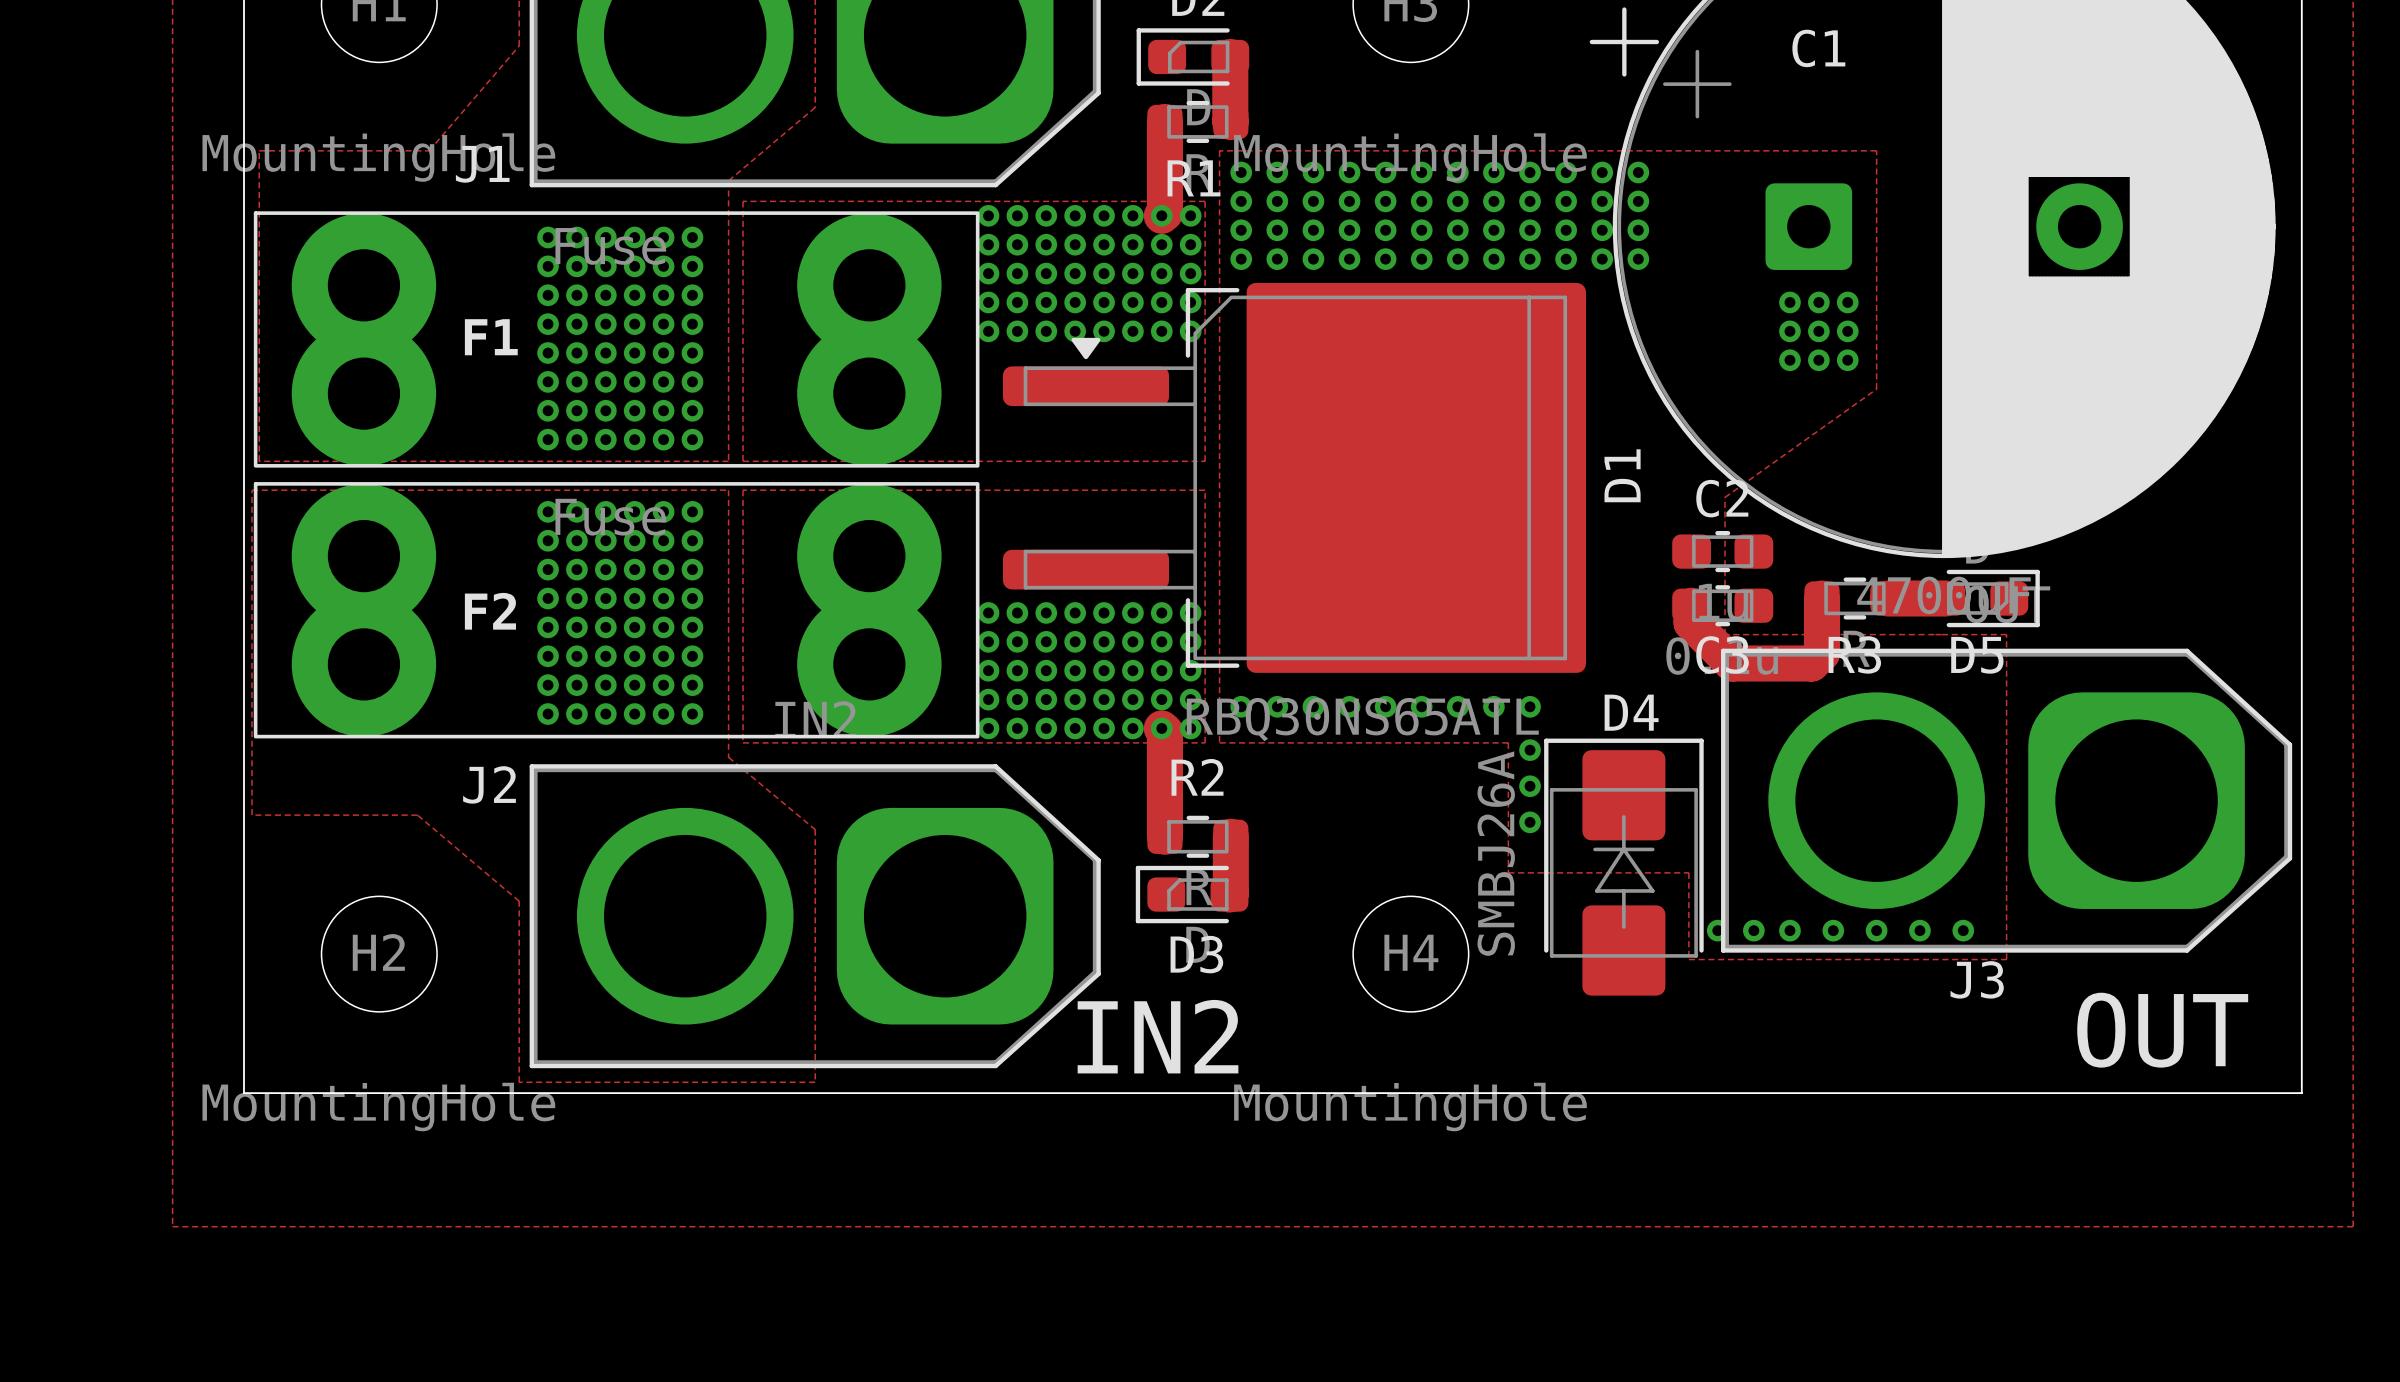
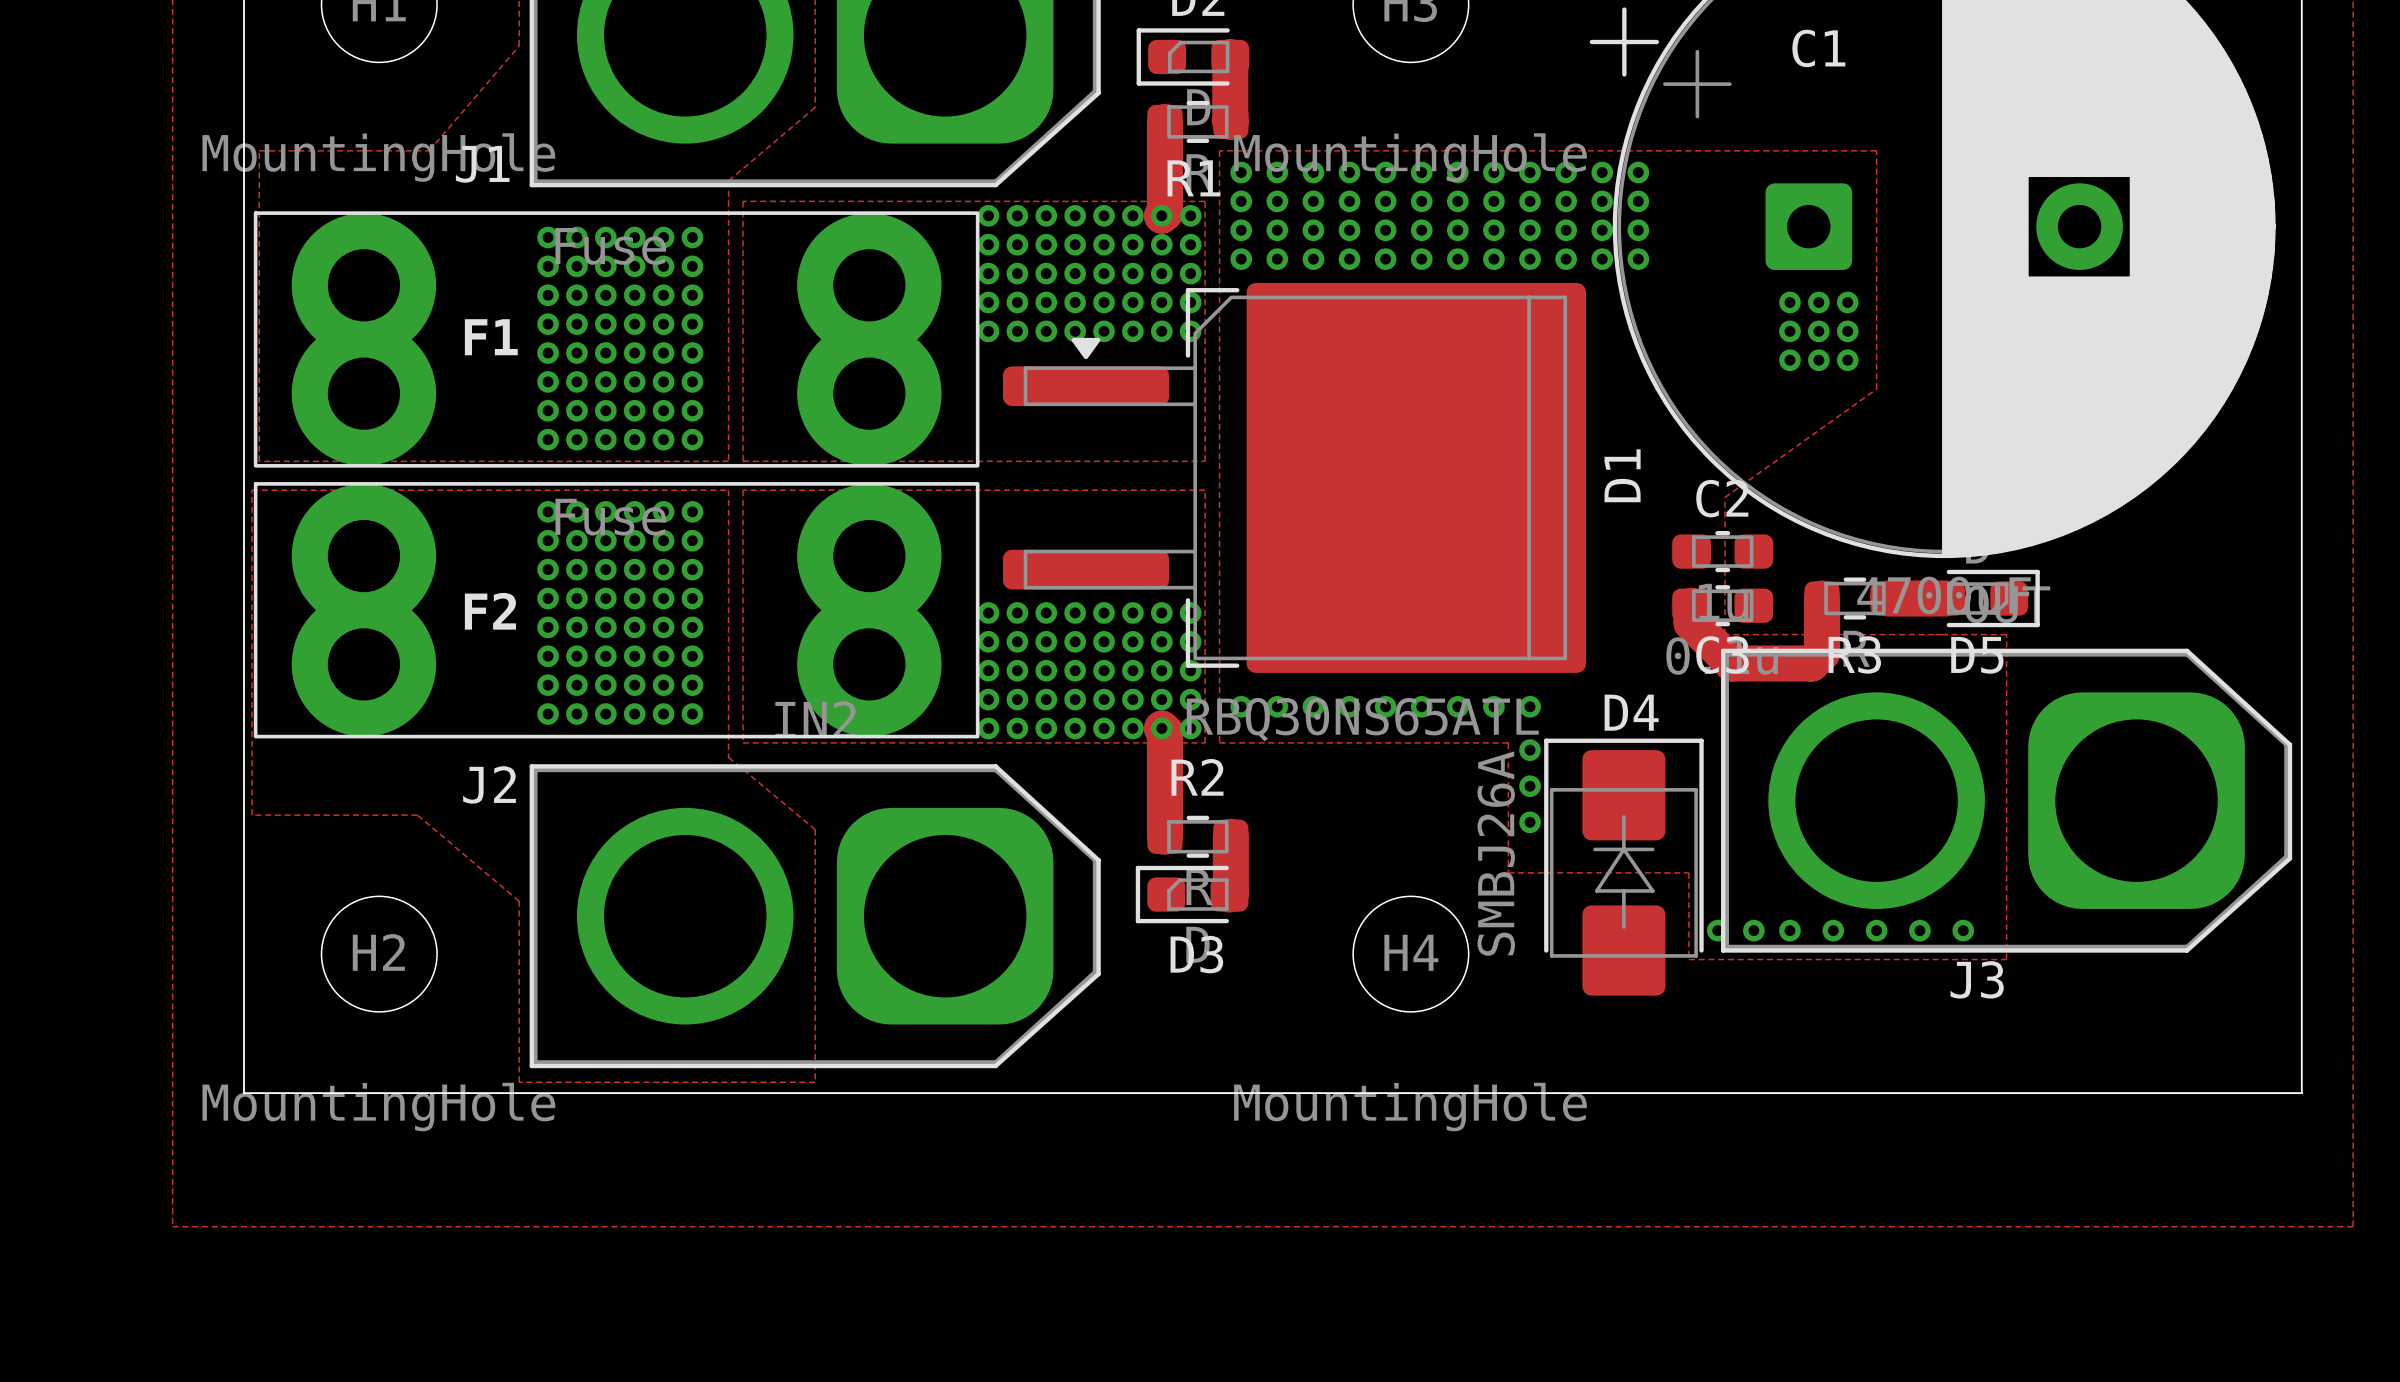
text: OUT (2162, 1030) -> none
text: IN2 (1158, 1036) -> none

